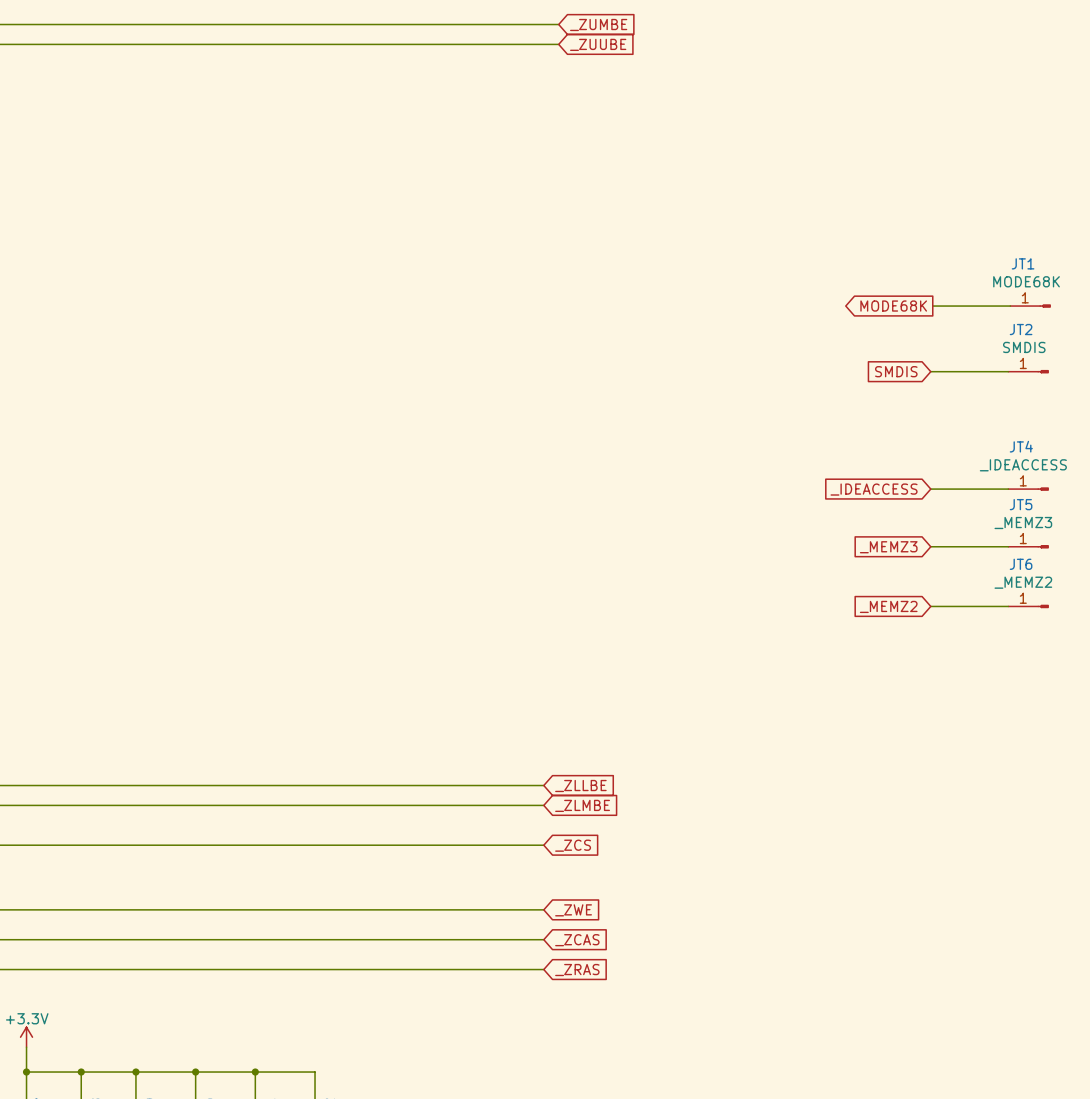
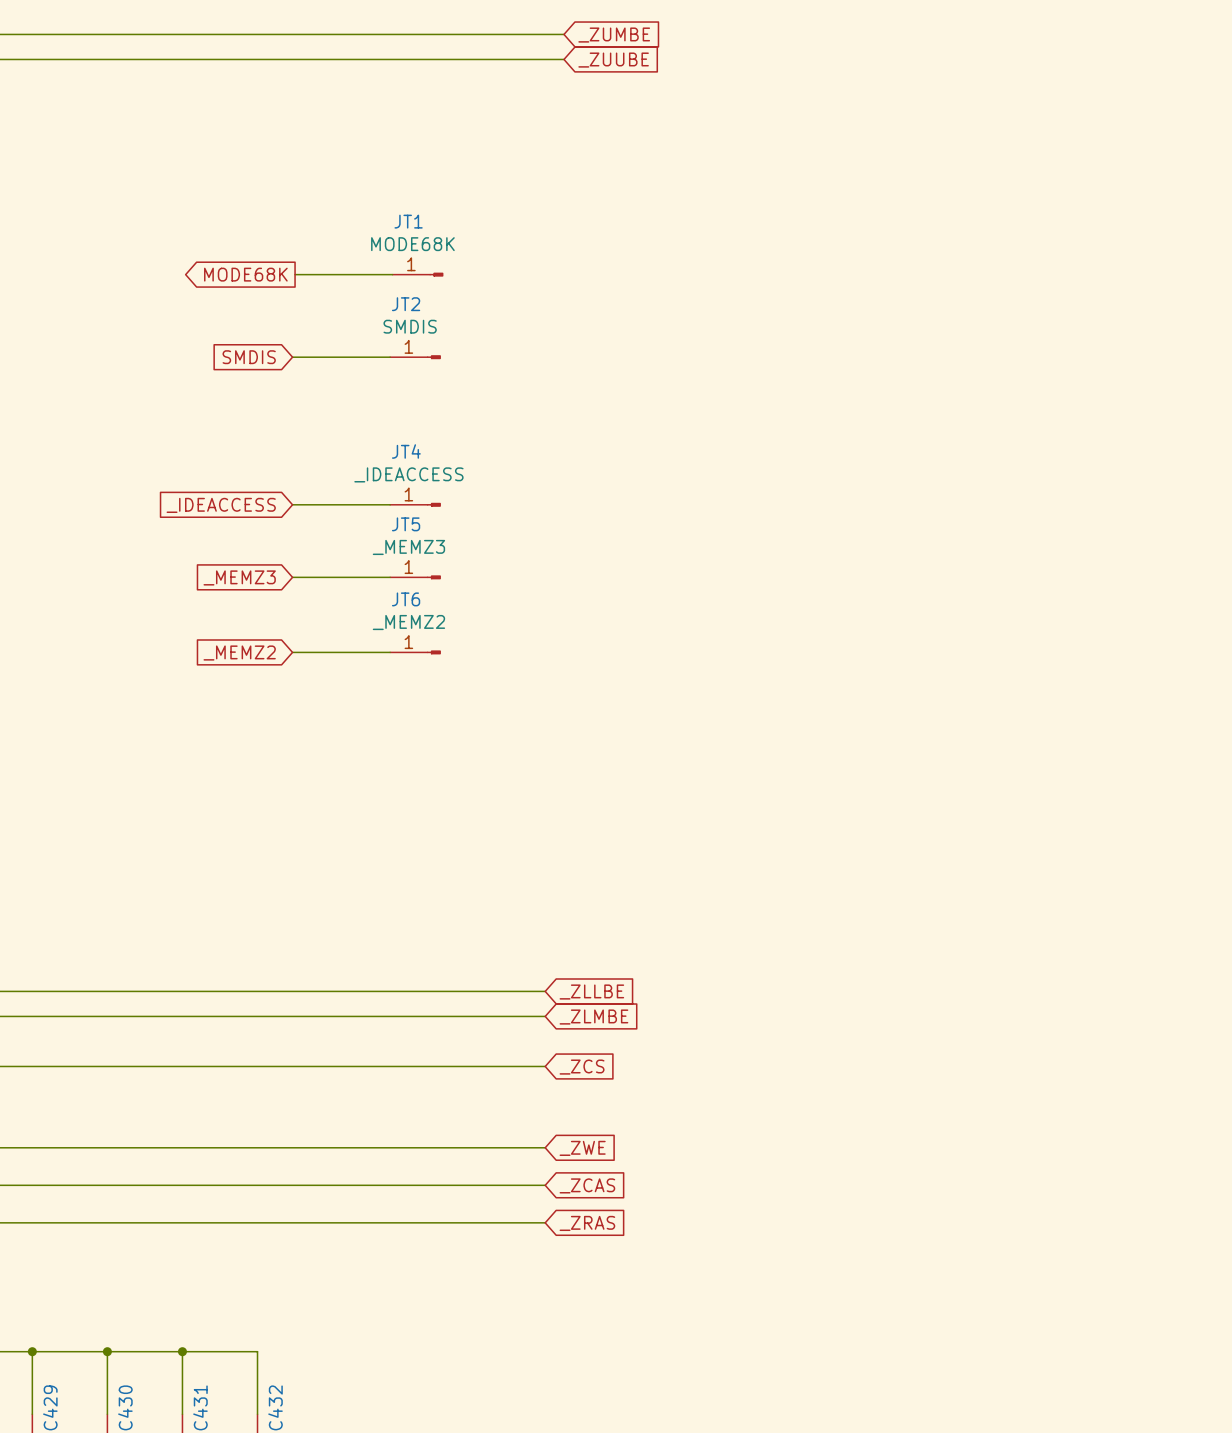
global label: none -> MODE68K (245, 274)
wire: none -> (295, 274) (392, 274)
global label: none -> SMDIS (249, 357)
wire: none -> (292, 357) (390, 357)
global label: MODE68K (893, 306) -> none
wire: (932, 306) (1010, 306) -> none
JT1 position: (1030, 306) -> (418, 274)
global label: SMDIS (896, 371) -> none
wire: (930, 371) (1008, 371) -> none
JT2 position: (1028, 371) -> (415, 357)
wire: none -> (292, 504) (390, 504)
global label: none -> _IDEACCESS (221, 505)
global label: none -> _MEMZ3 (239, 577)
wire: none -> (292, 577) (390, 577)
global label: _IDEACCESS (874, 489) -> none
wire: (930, 489) (1008, 489) -> none
JT4 position: (1028, 489) -> (415, 504)
wire: none -> (292, 652) (390, 652)
global label: none -> _MEMZ2 (239, 653)
wire: (930, 546) (1008, 546) -> none
JT5 position: (1028, 546) -> (415, 577)
global label: _MEMZ3 (888, 547) -> none
global label: _MEMZ2 (888, 606) -> none
wire: (930, 606) (1008, 606) -> none
JT6 position: (1028, 606) -> (415, 652)

